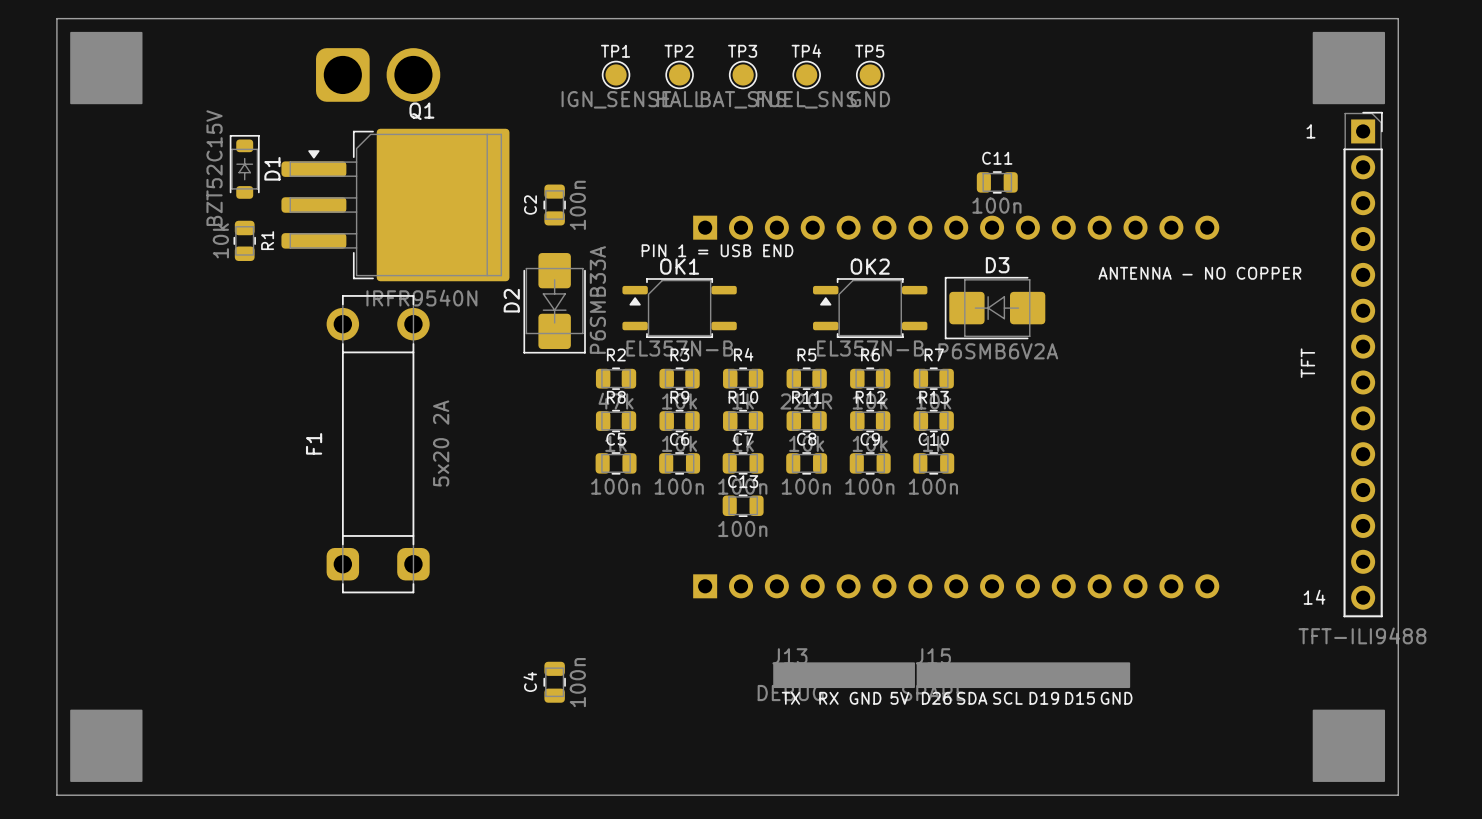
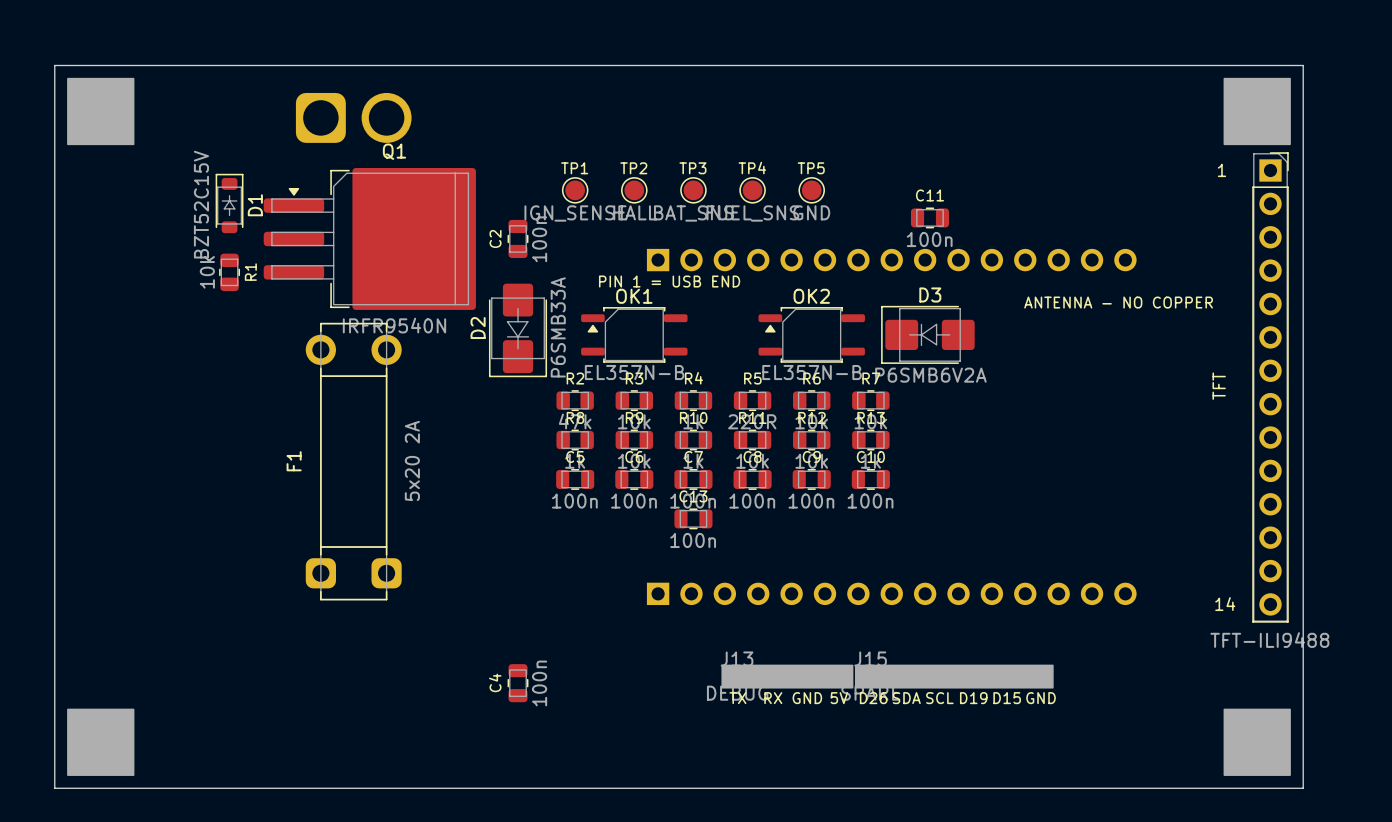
TP1 position: (616, 74) -> (575, 190)
TP2 position: (679, 74) -> (634, 190)
TP3 position: (743, 74) -> (693, 190)
TP4 position: (806, 74) -> (752, 190)
TP5 position: (870, 74) -> (811, 190)

